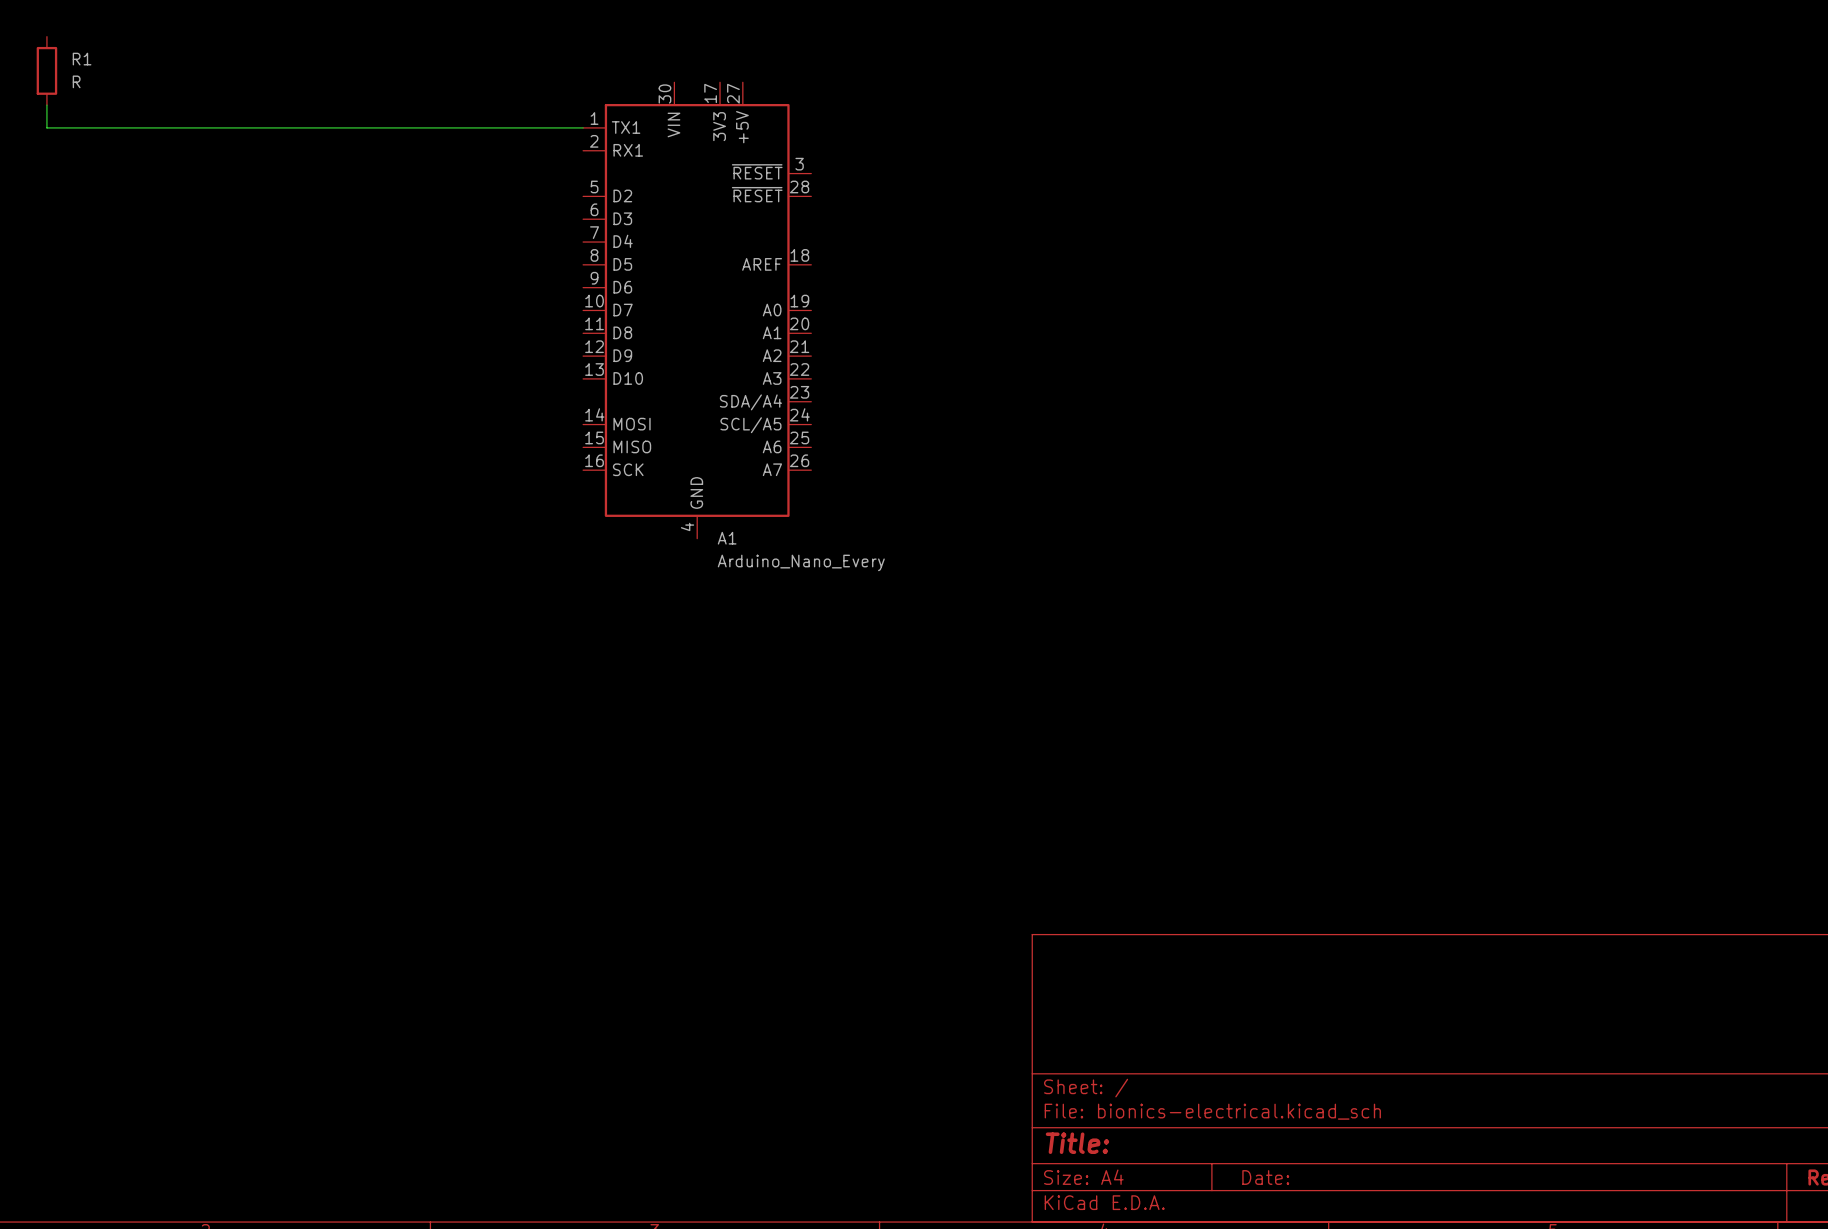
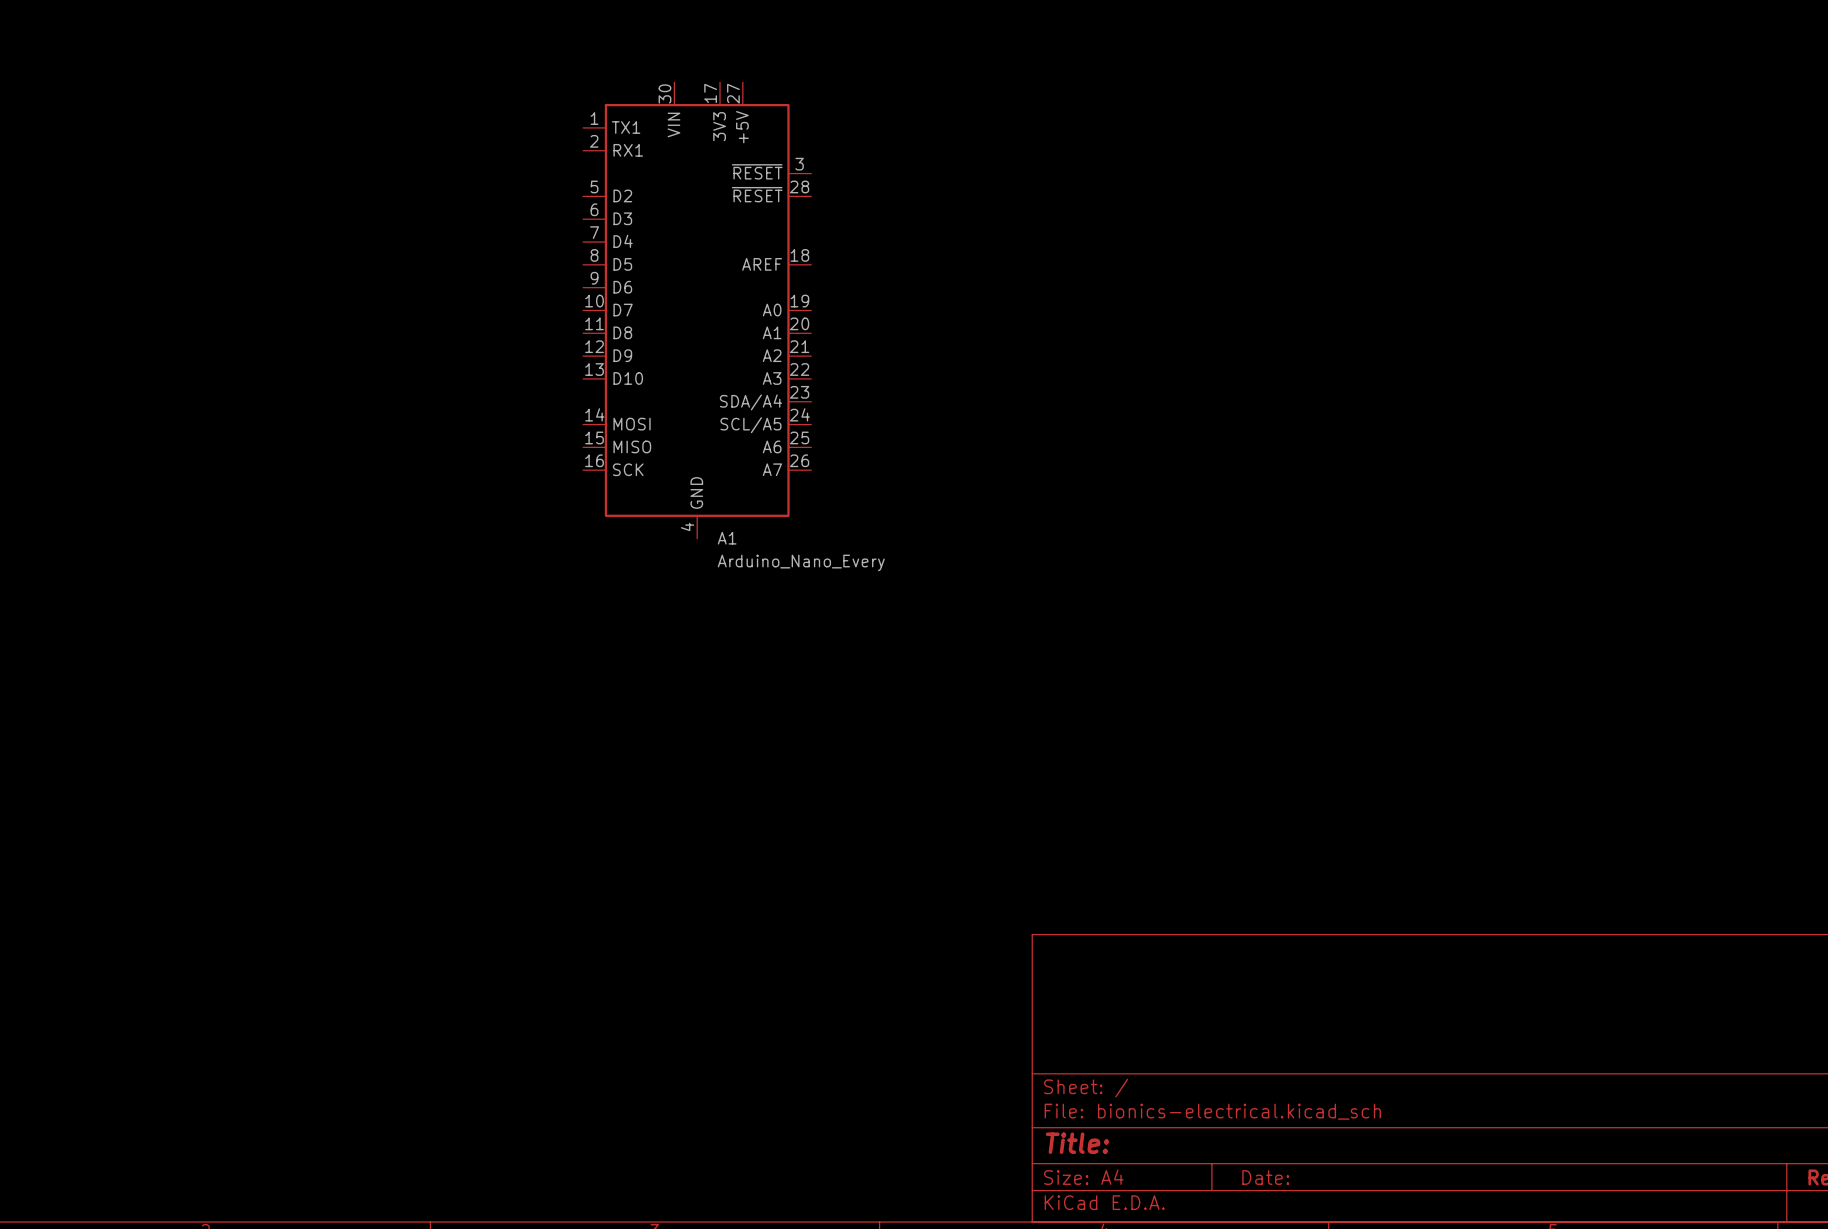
R1: R (46, 70) -> none
wire: (46, 105) (46, 127) (583, 127) -> none

